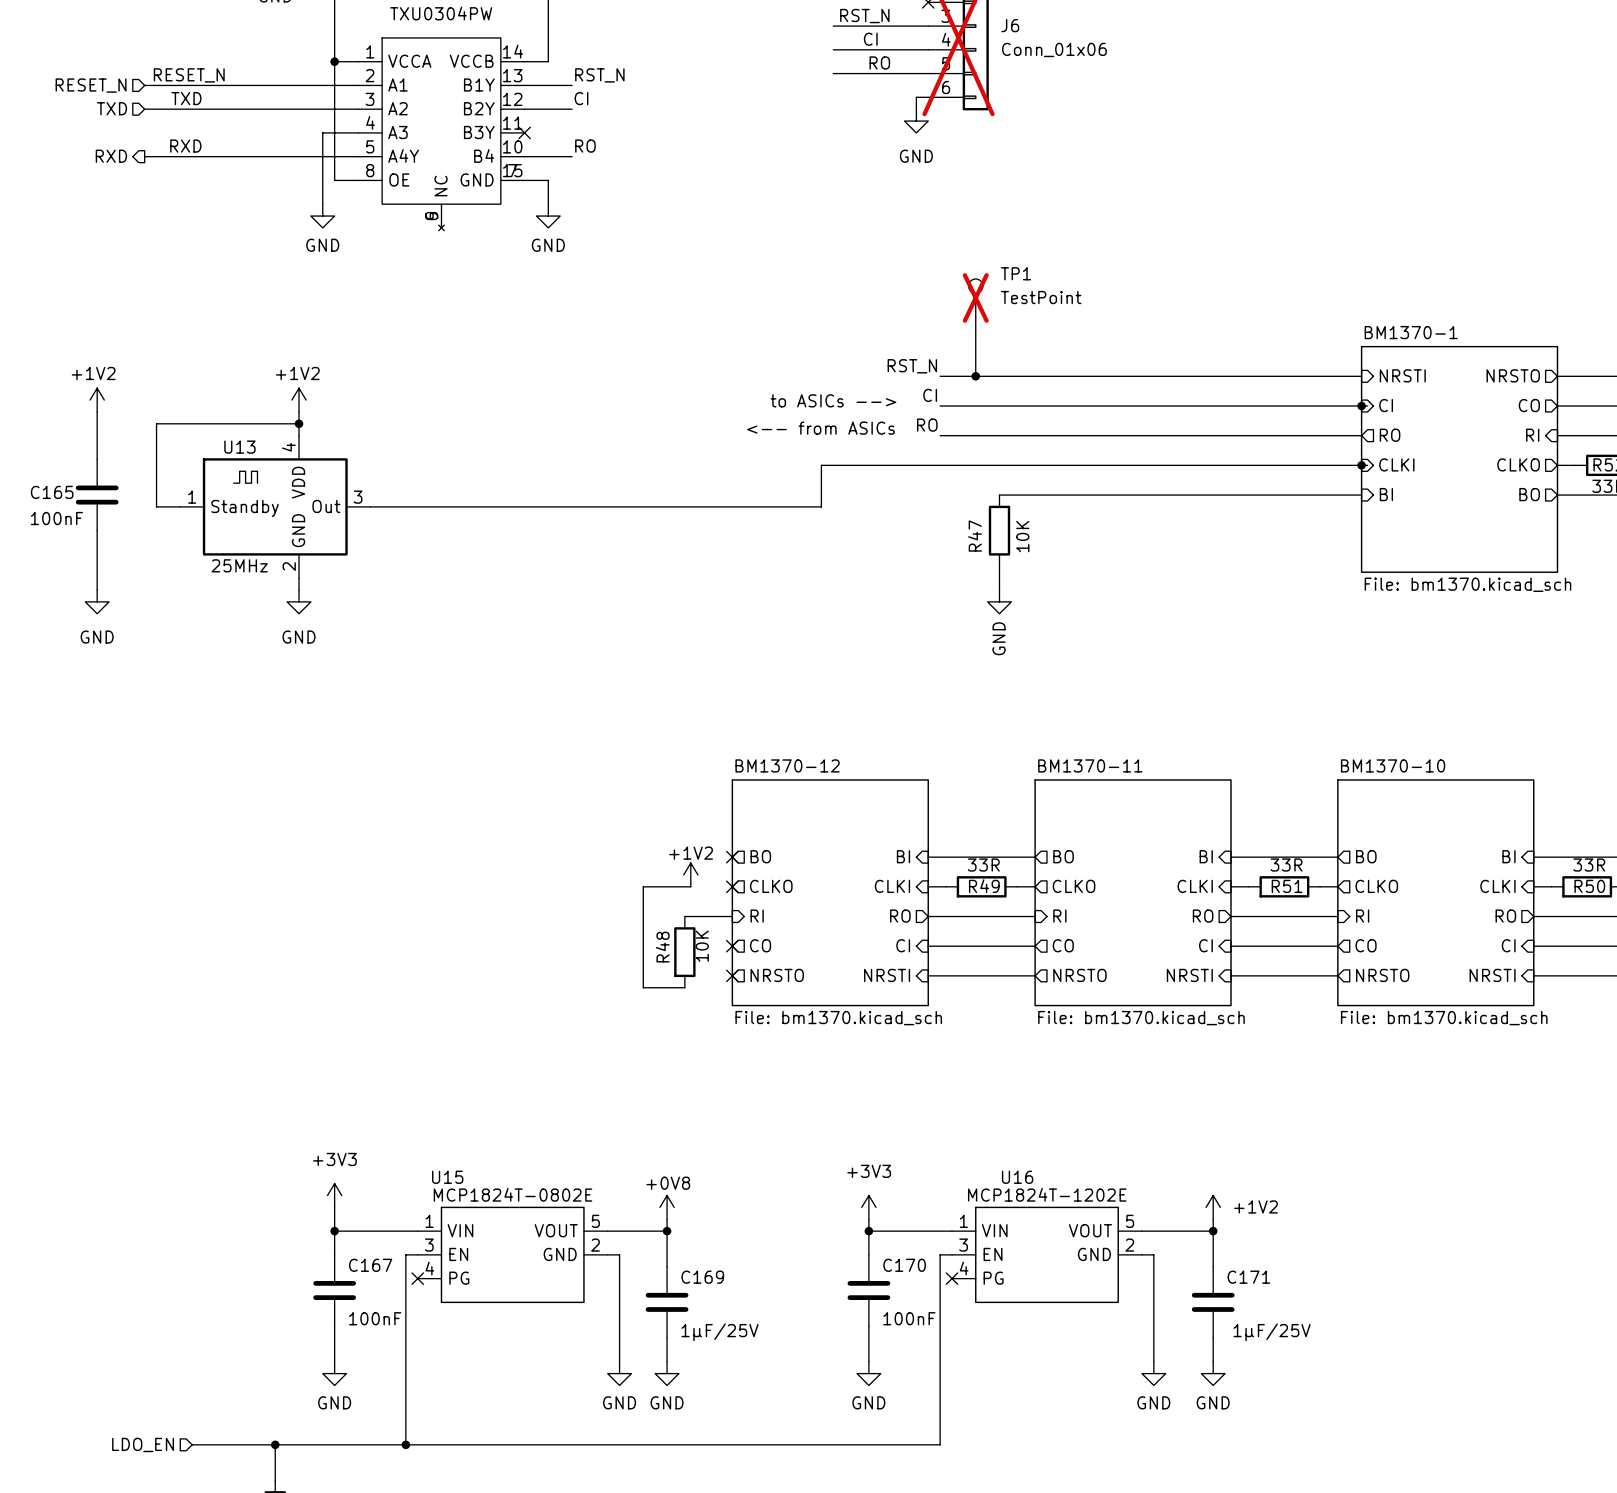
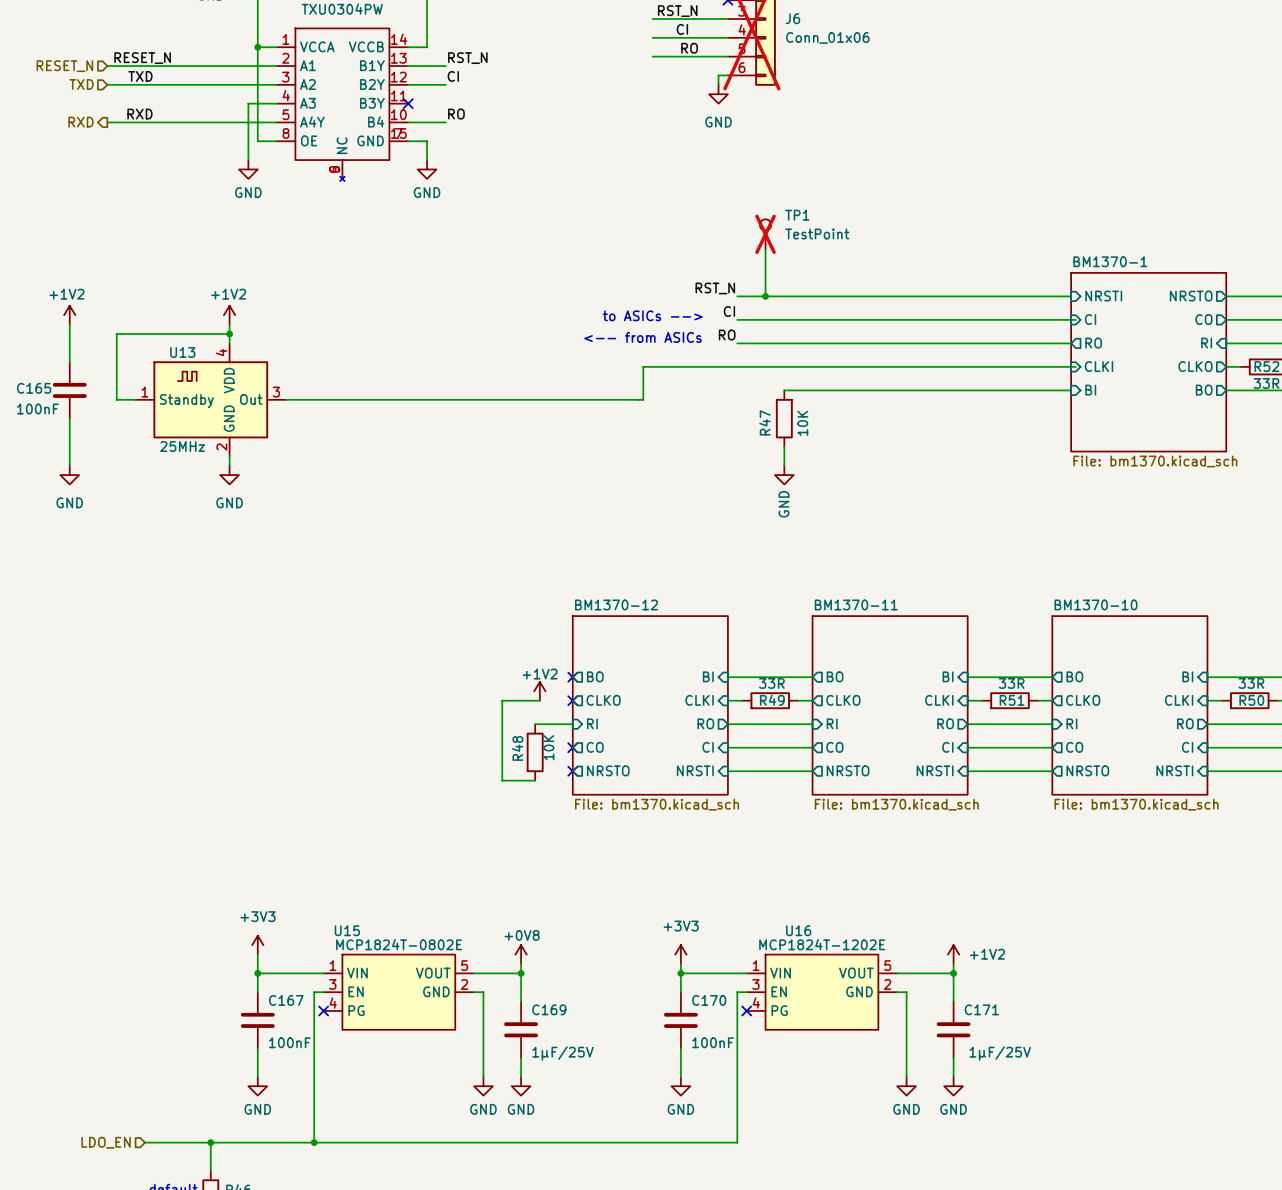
junction: (1361, 406) -> none
junction: (1361, 465) -> none

